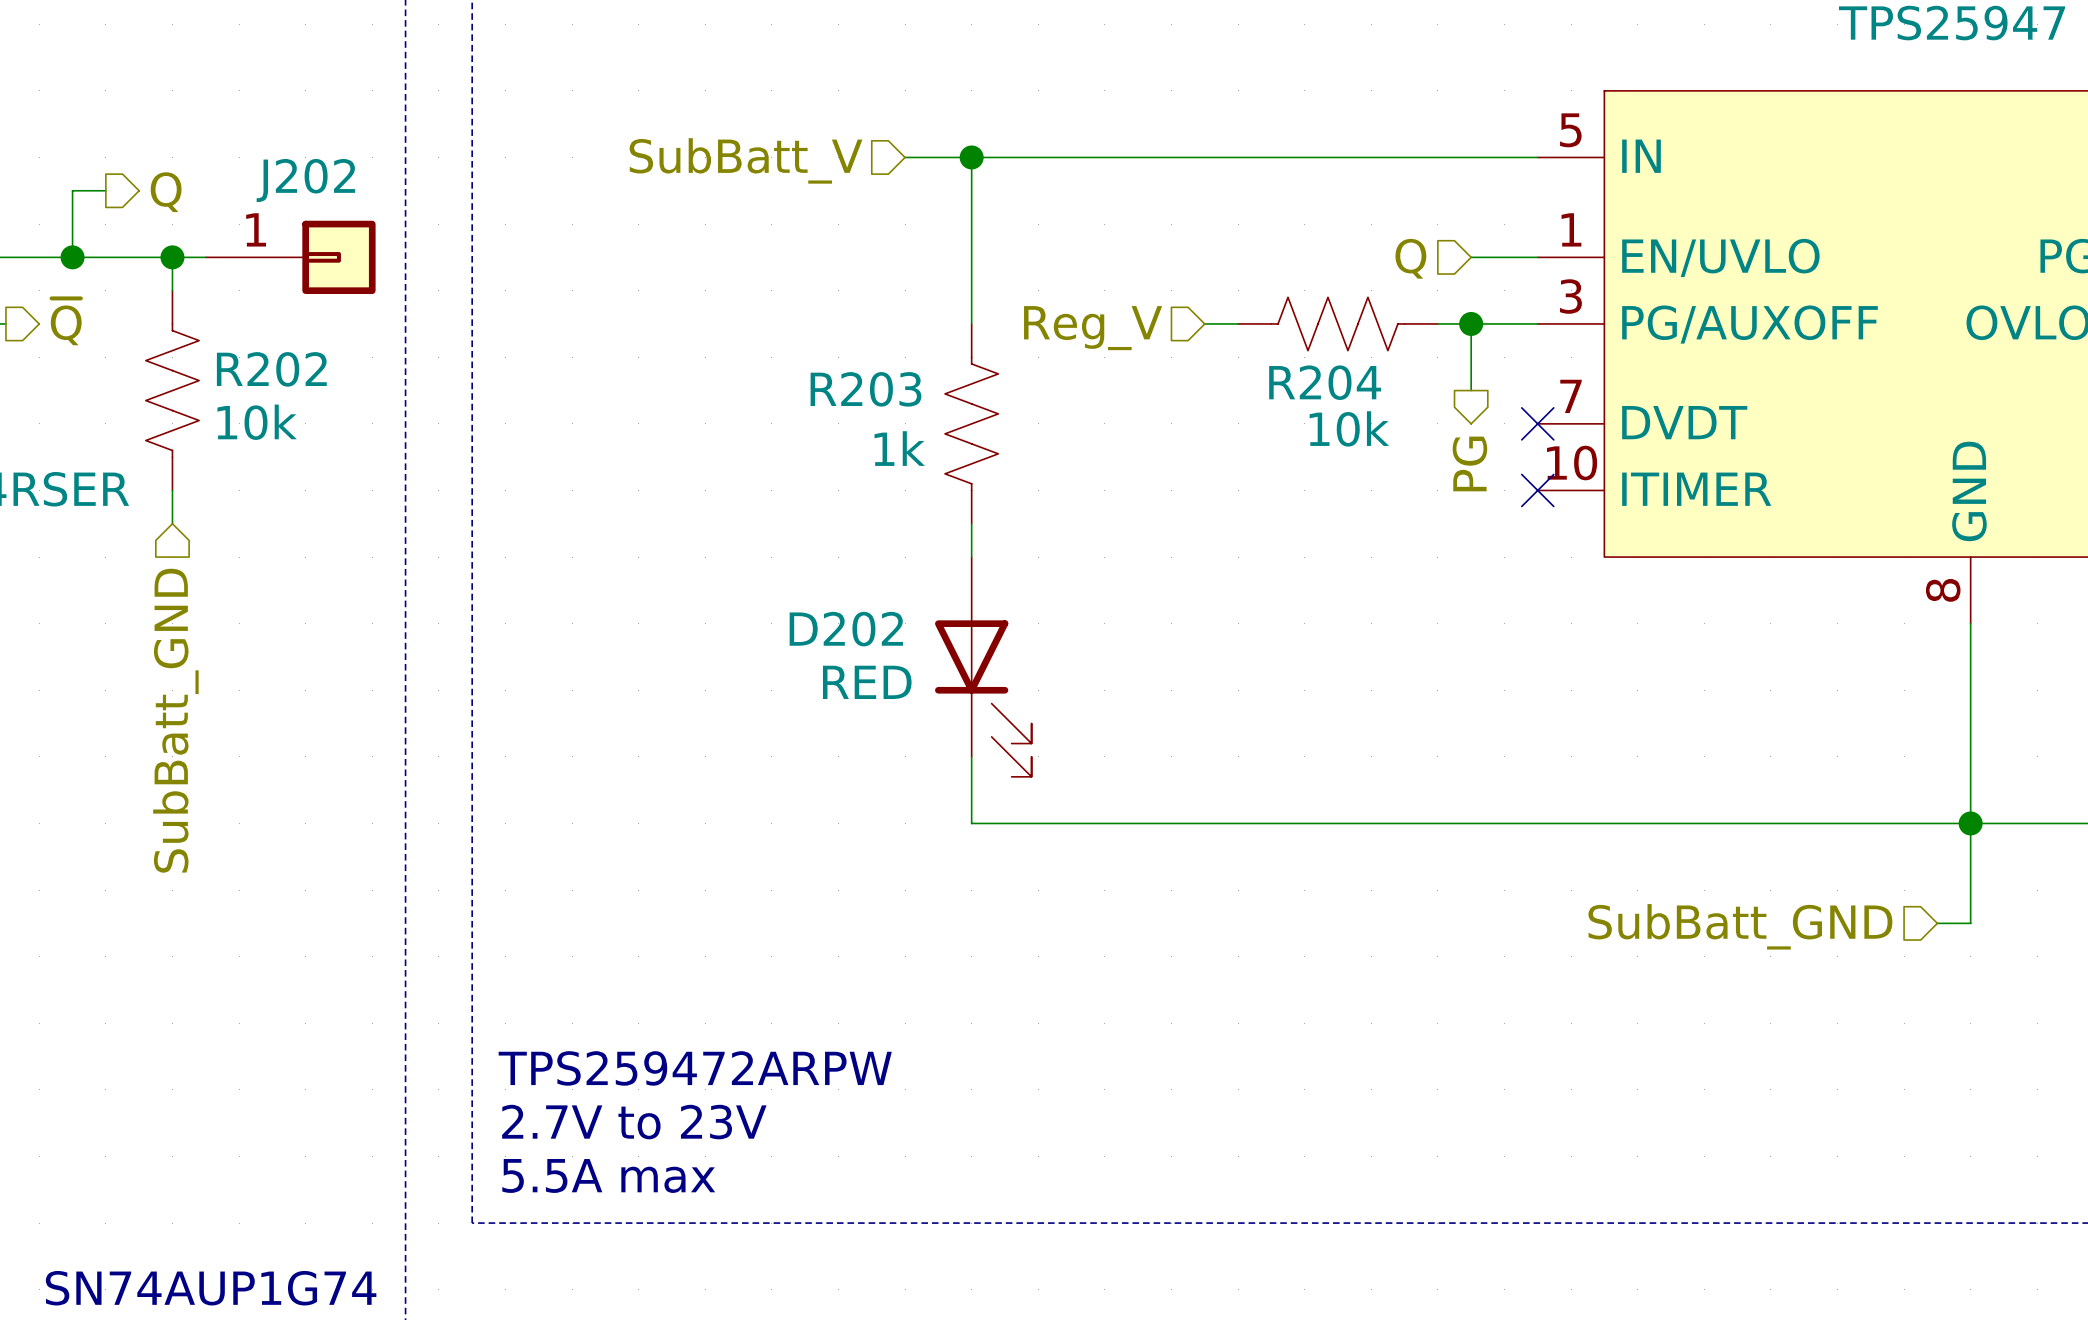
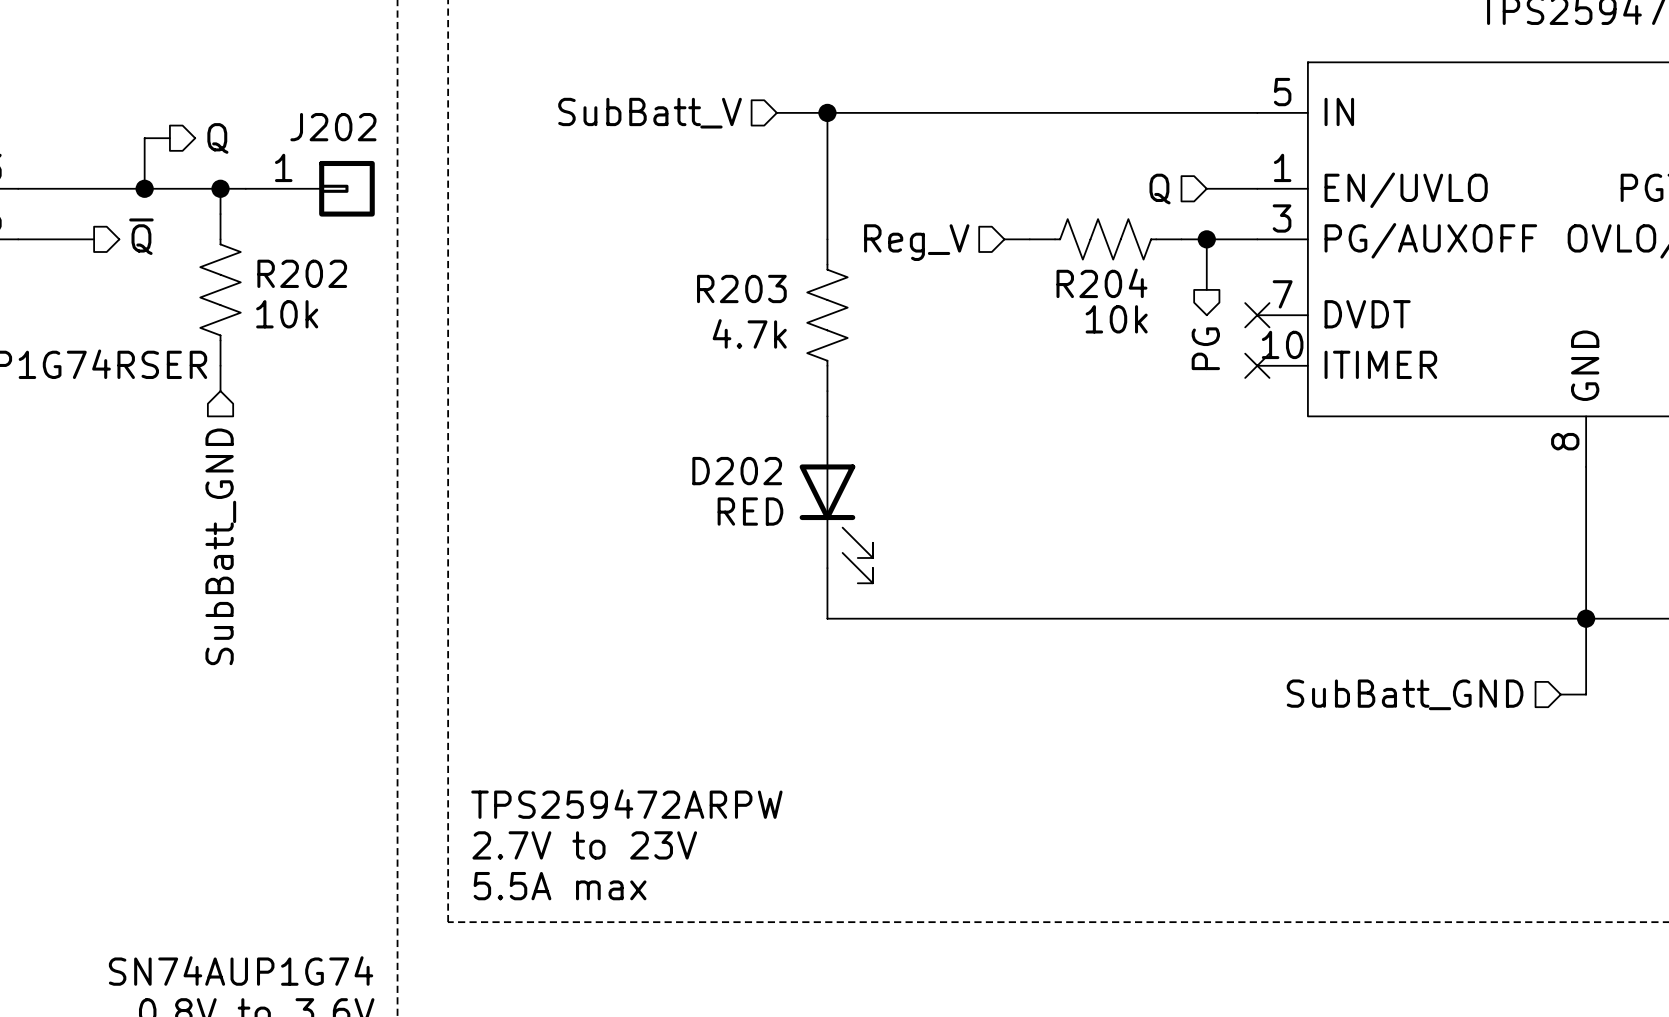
R203 value: 1k (899, 448) -> 4.7k (749, 333)

